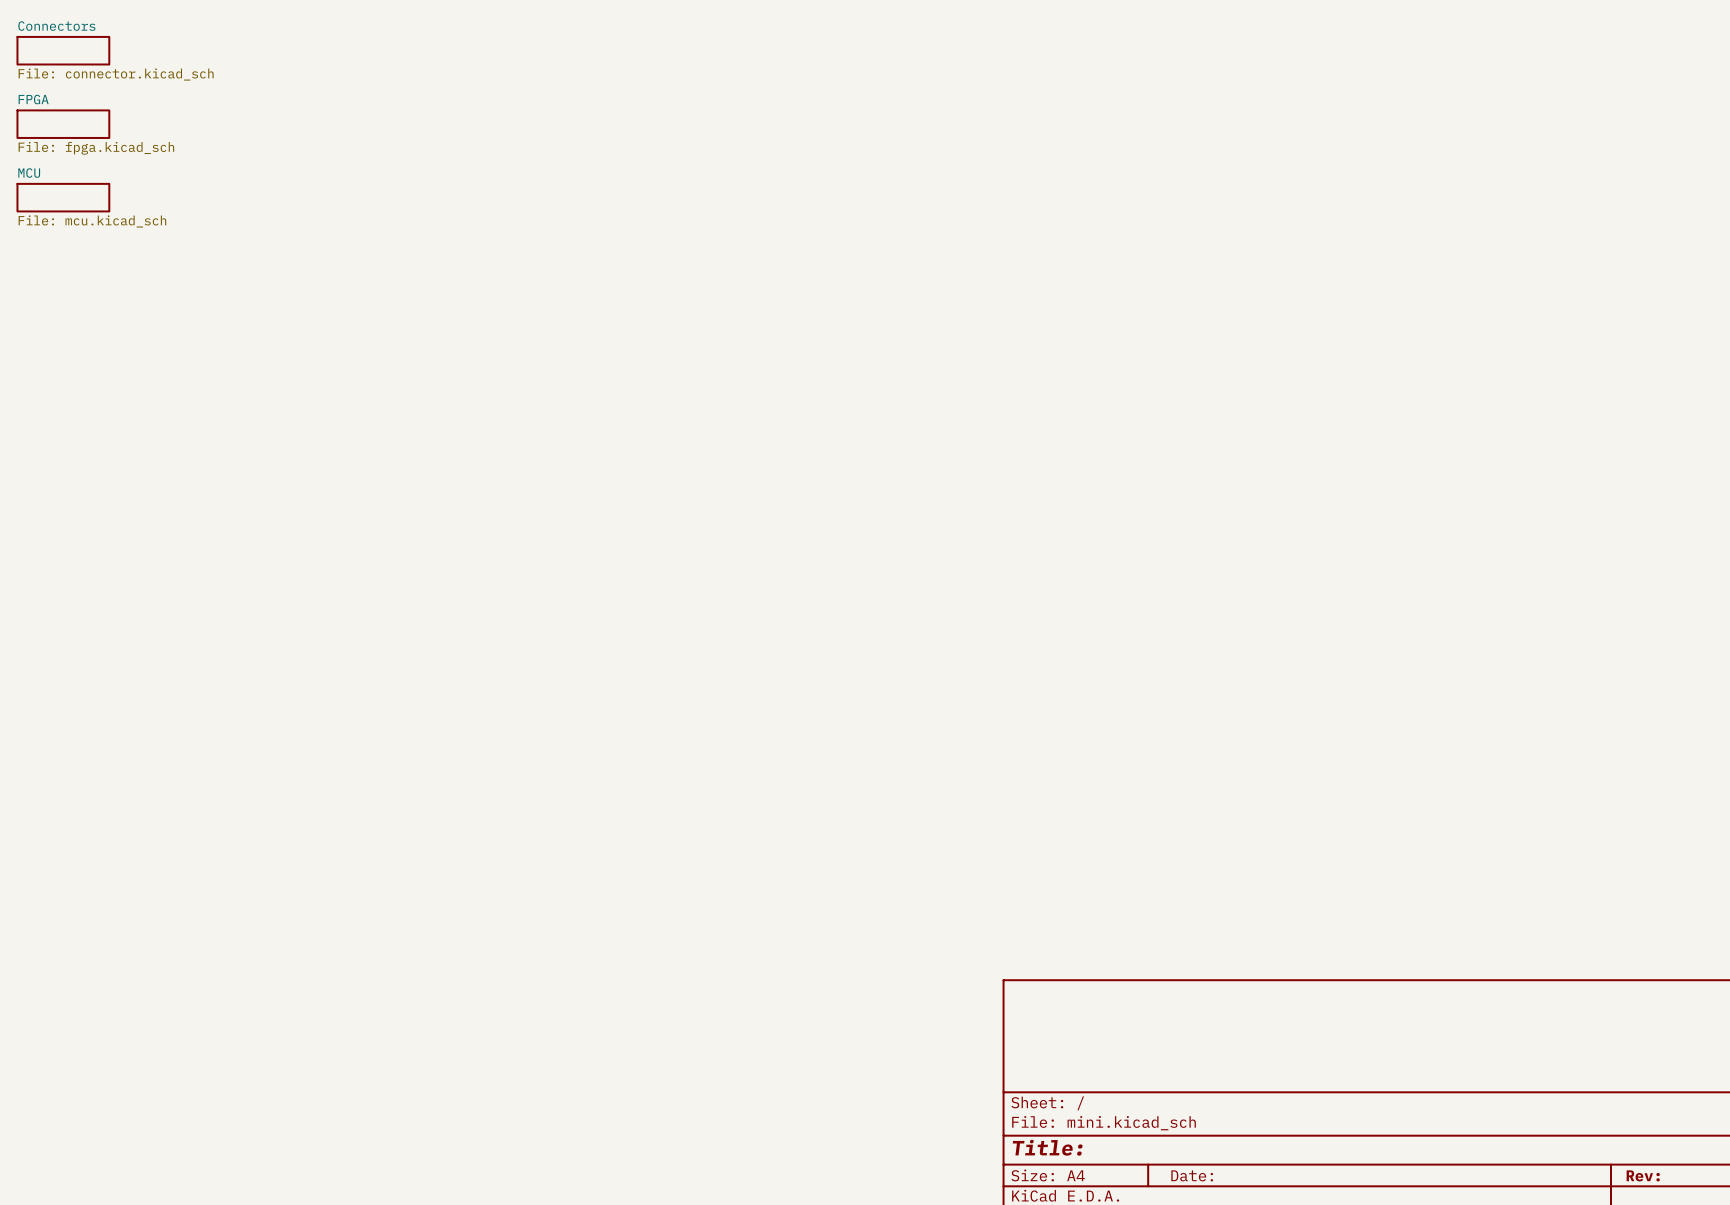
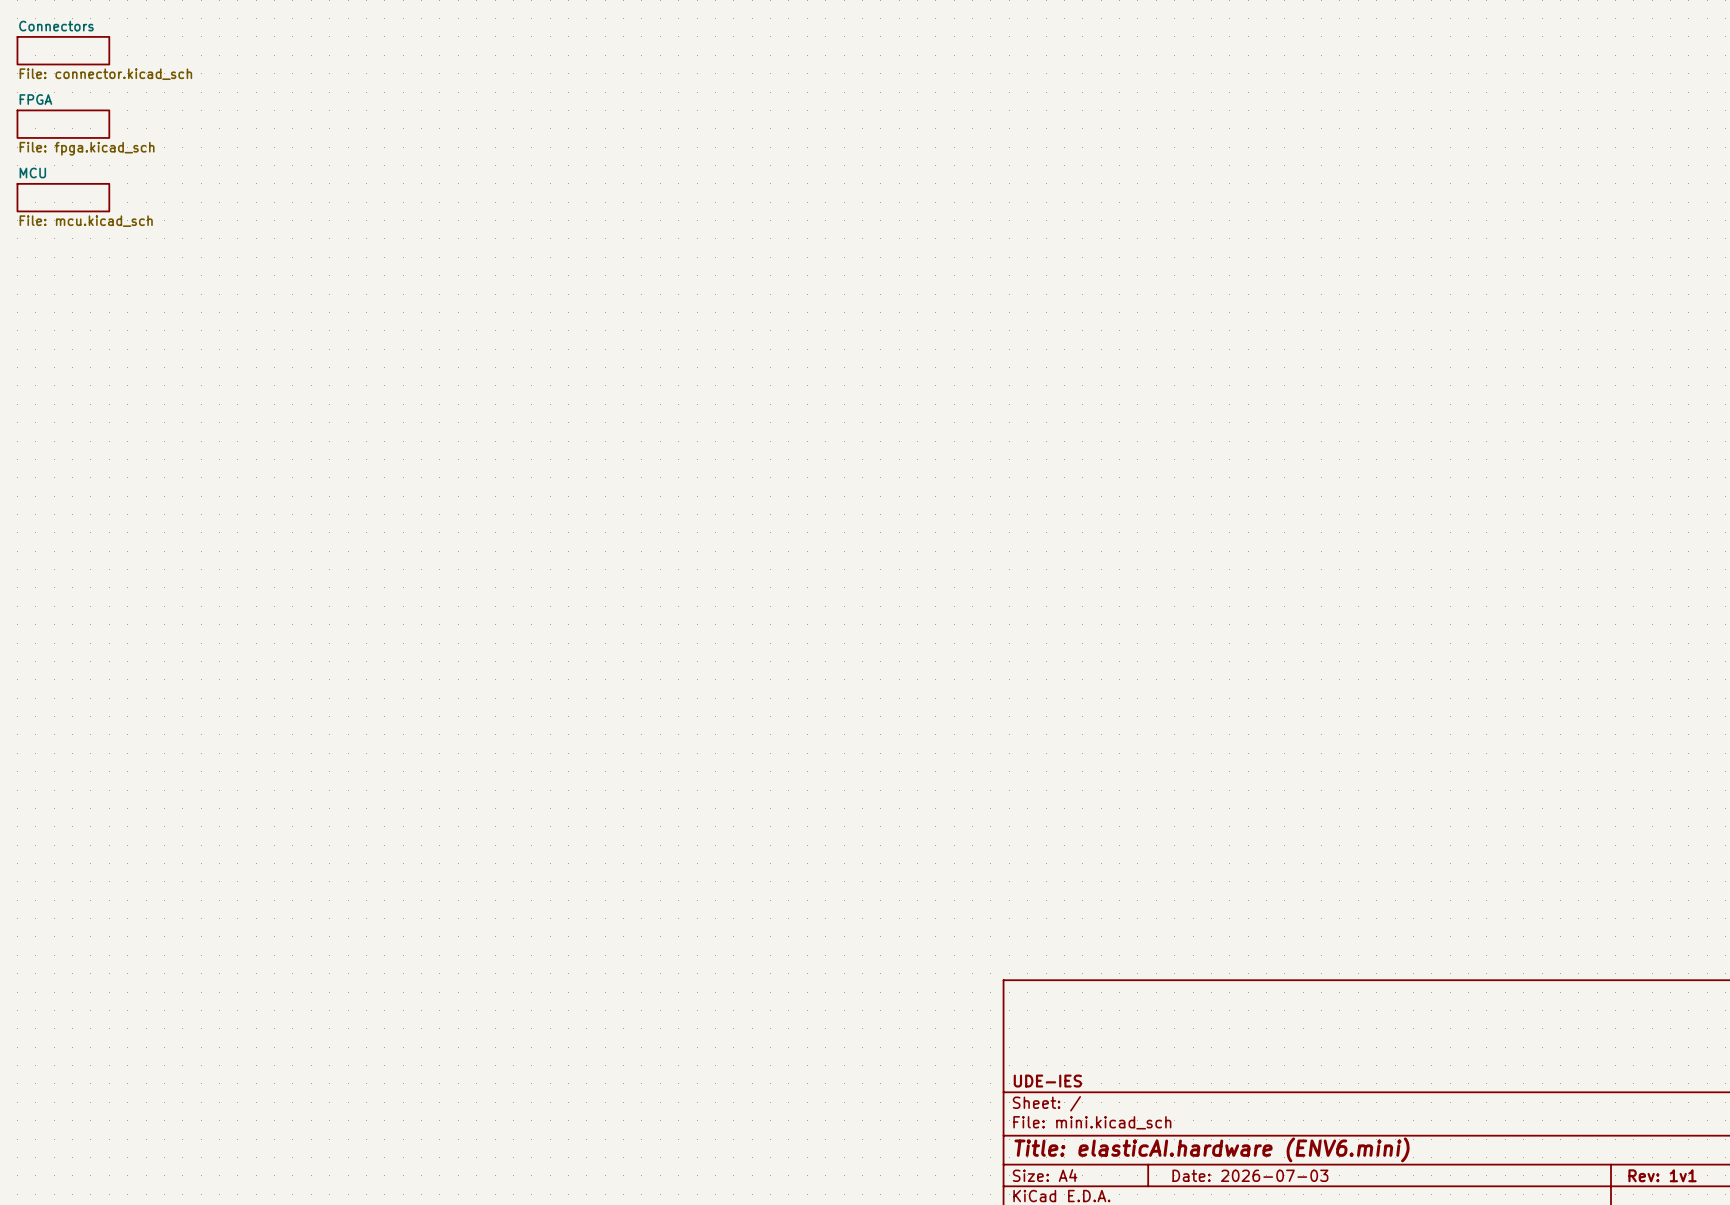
title block: none -> UDE-IES (1047, 1081)
title block: Title: (1047, 1147) -> Title: elasticAI.hardware (ENV6.mini) (1212, 1149)
title block: Date: (1192, 1175) -> Date: 2026-07-03 (1250, 1175)
title block: Rev: (1643, 1175) -> Rev: 1v1 (1662, 1175)

